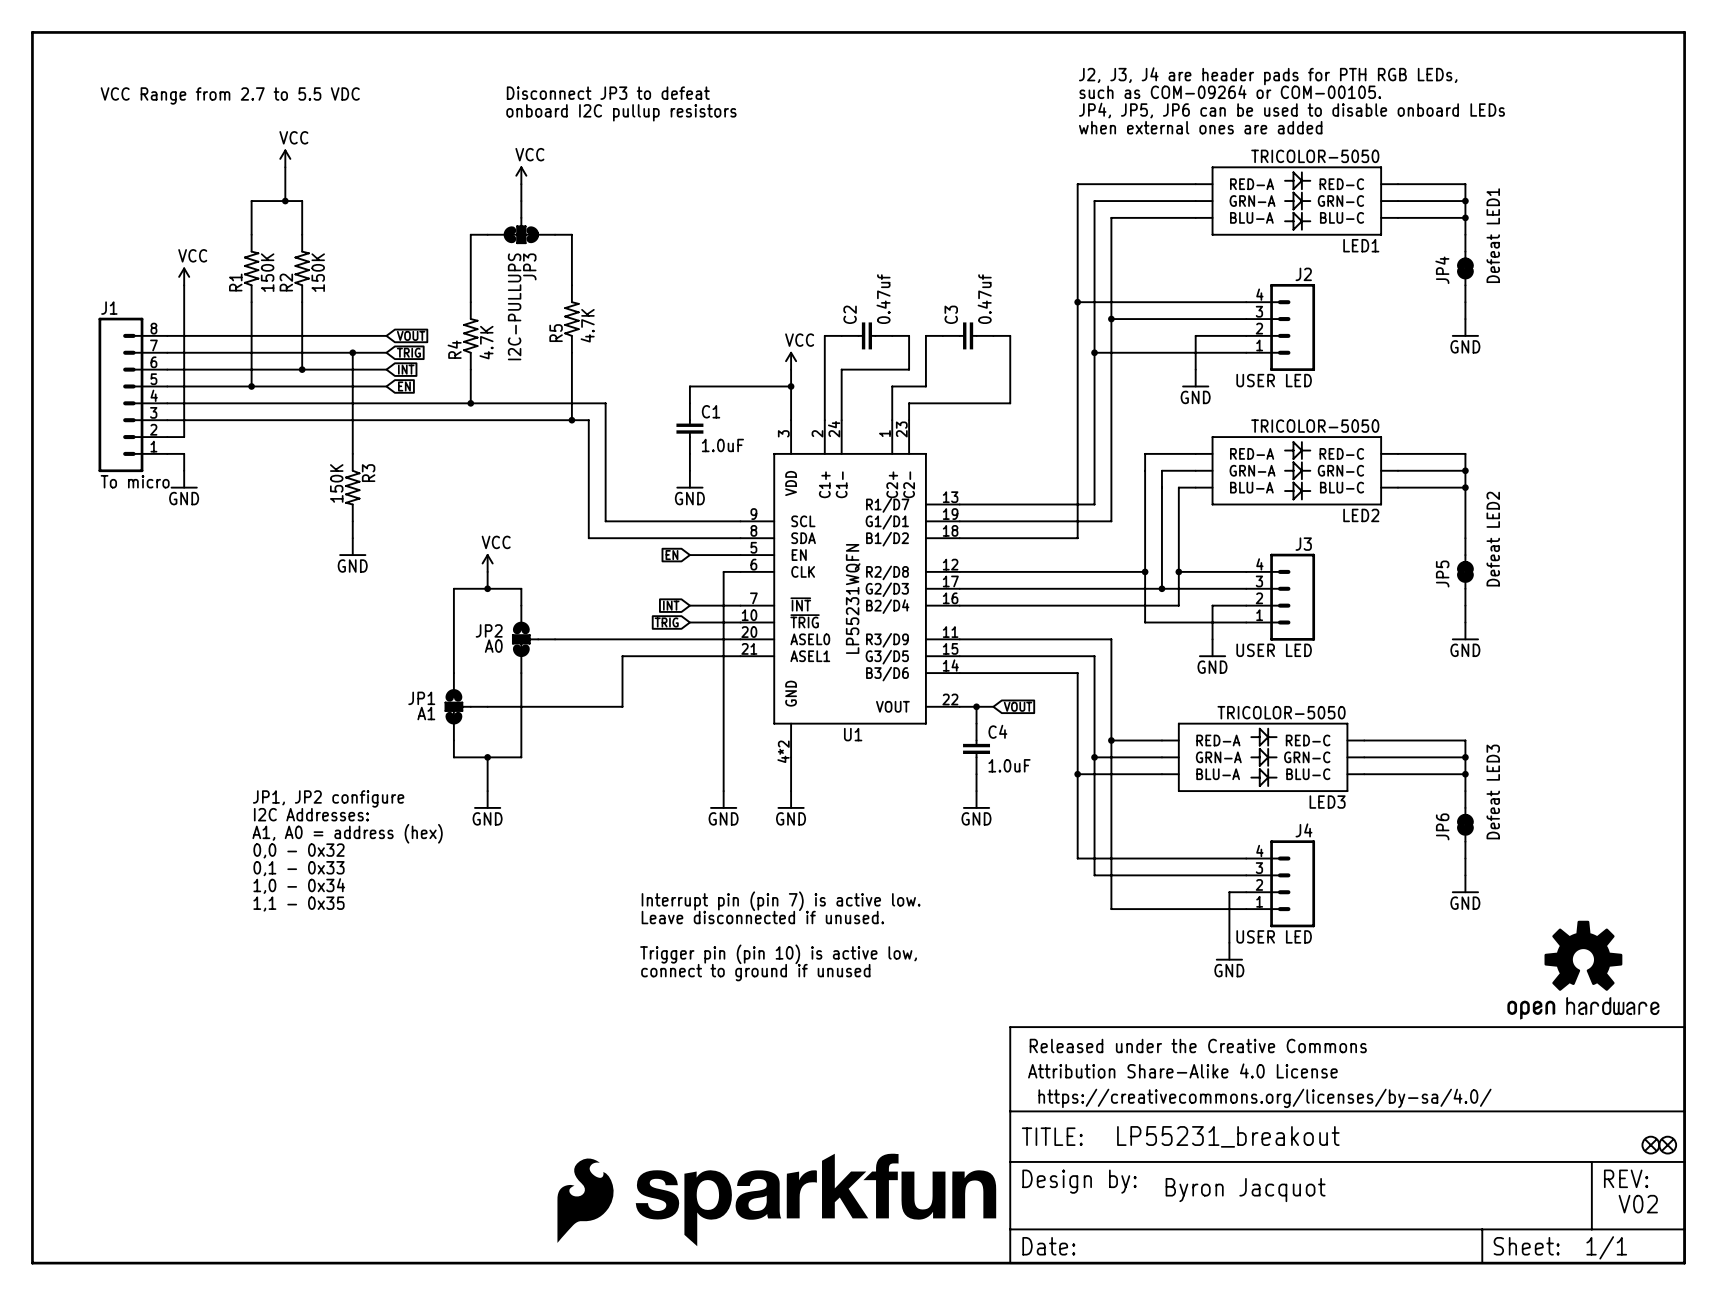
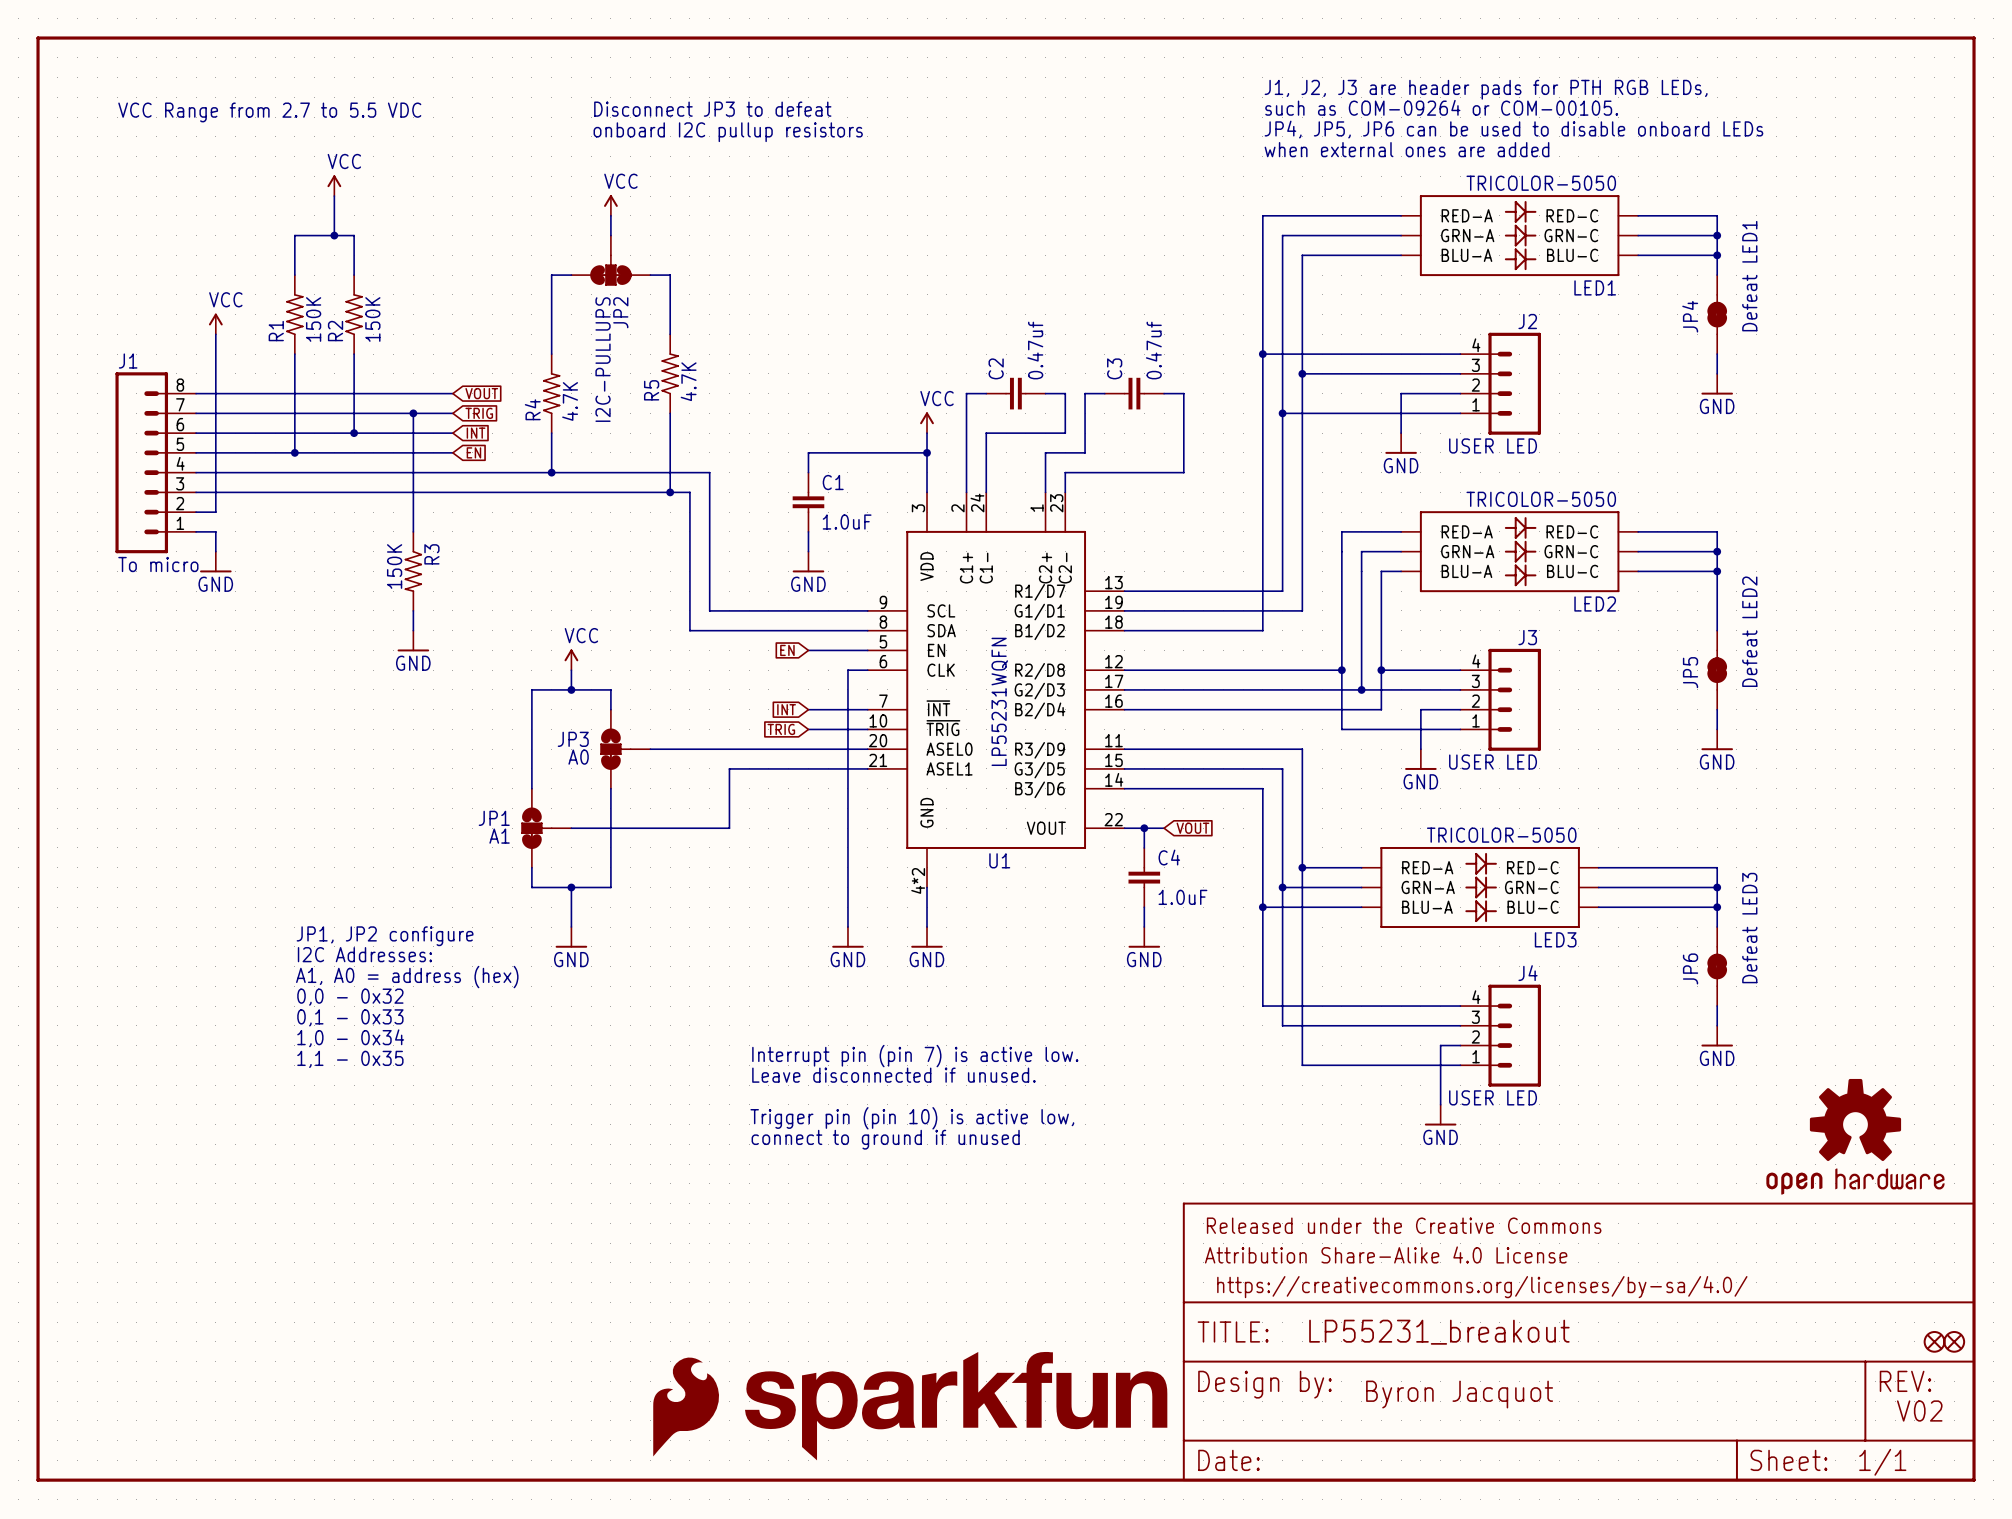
text: J2, J3, J4 are header pads for PTH RGB LEDs, (1268, 76) -> J1, J2, J3 are header pads for PTH RGB LEDs, (1486, 89)
JP3 name: JP3 (529, 266) -> JP2 (620, 312)
JP2 name: JP2 (489, 630) -> JP3 (573, 739)

